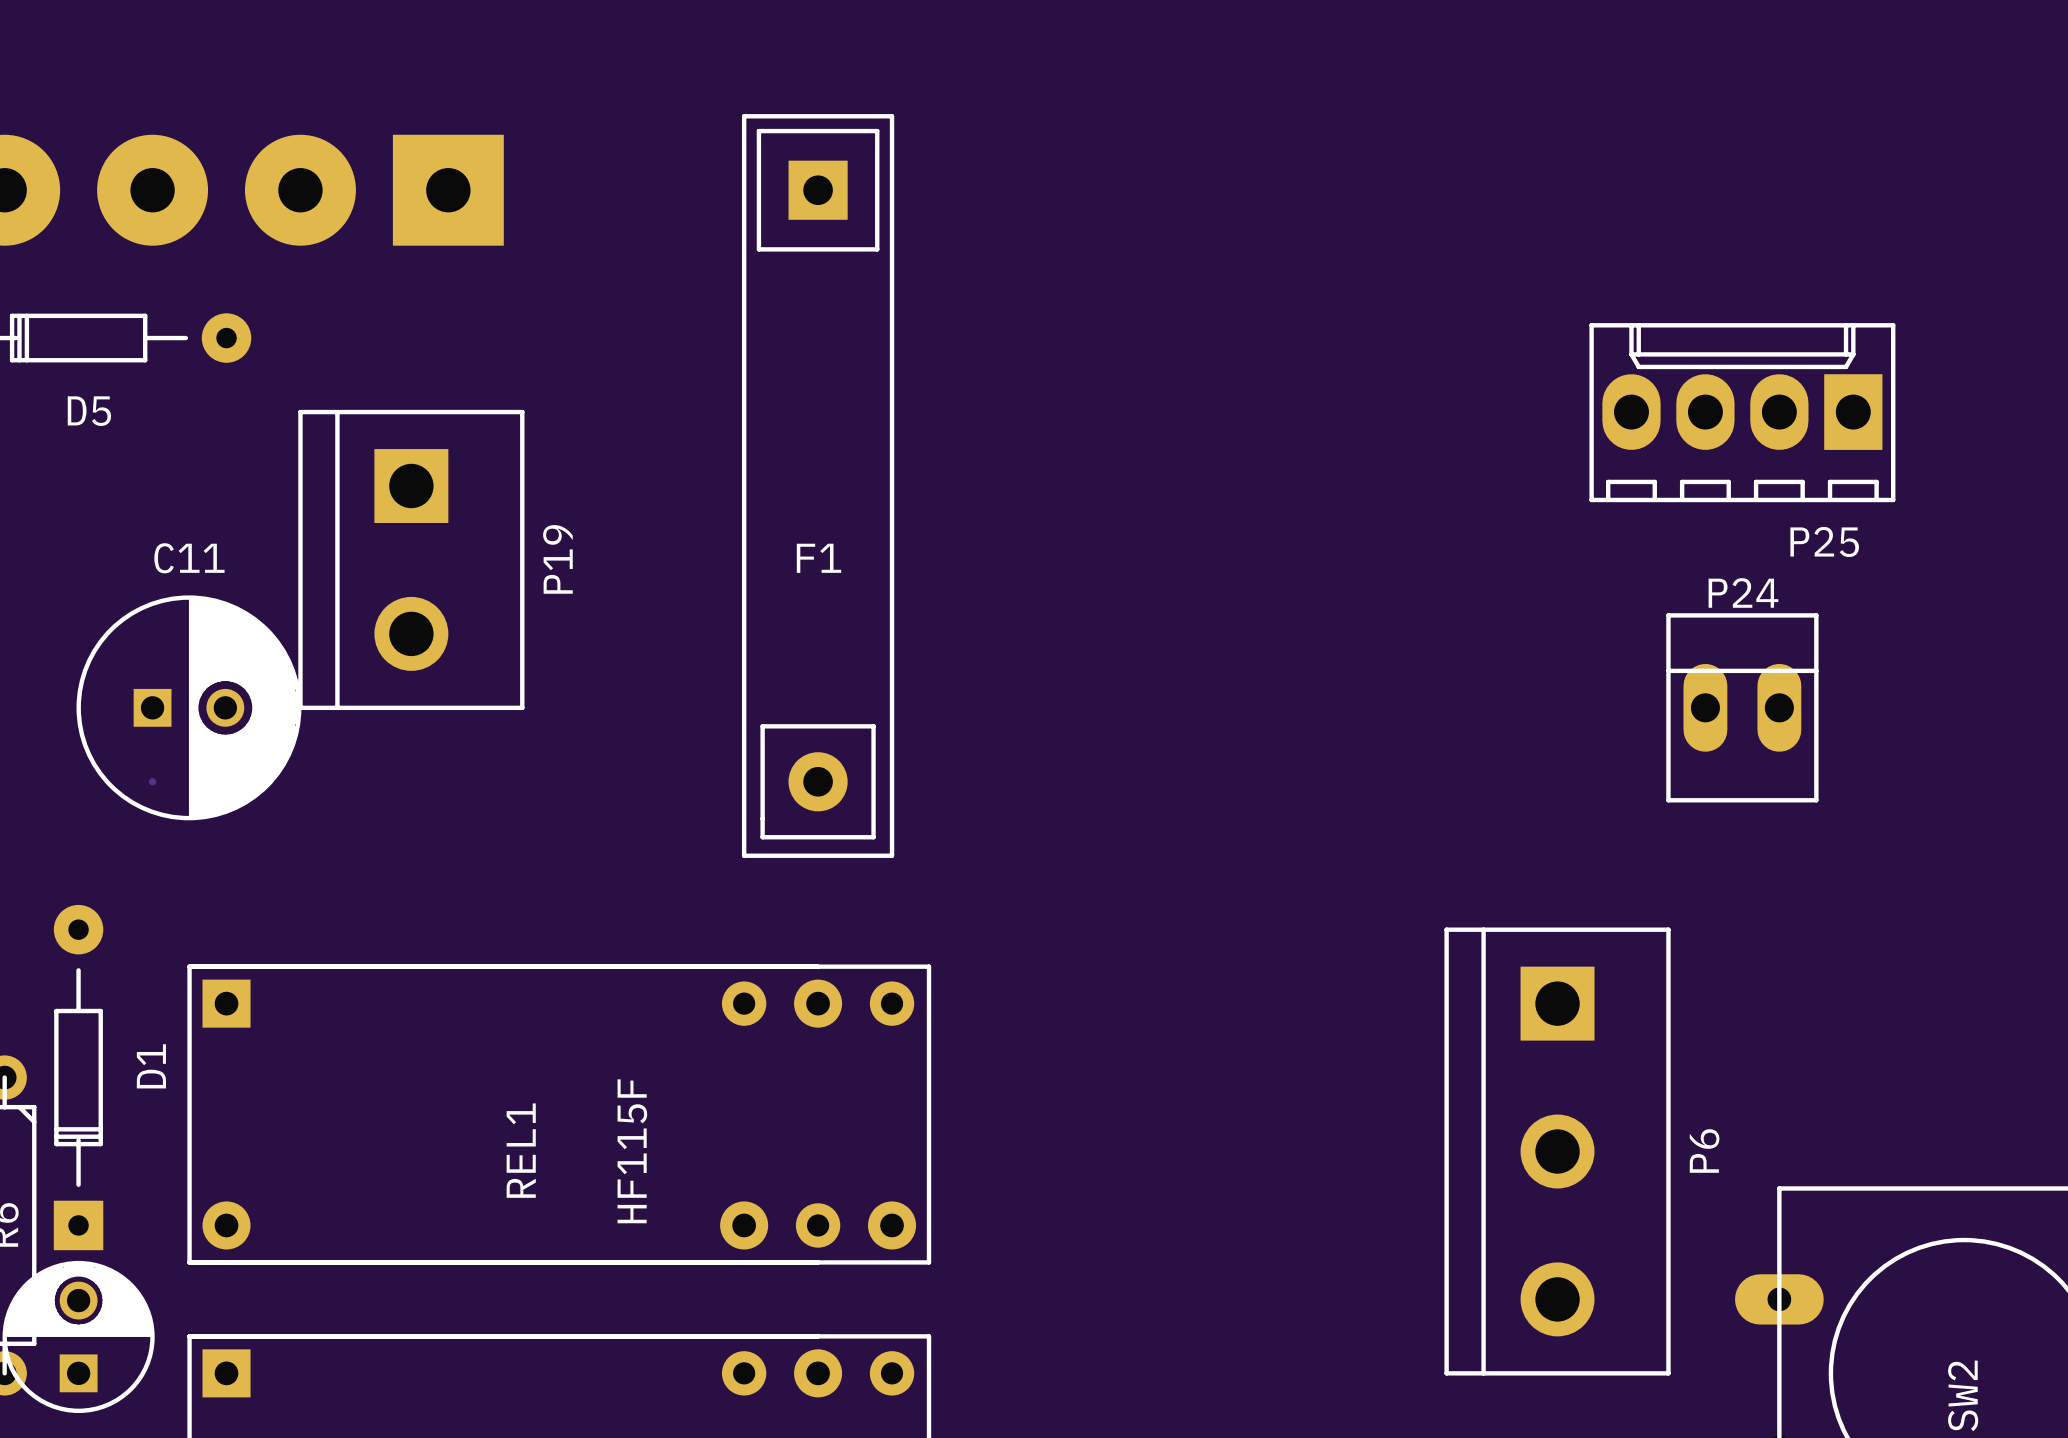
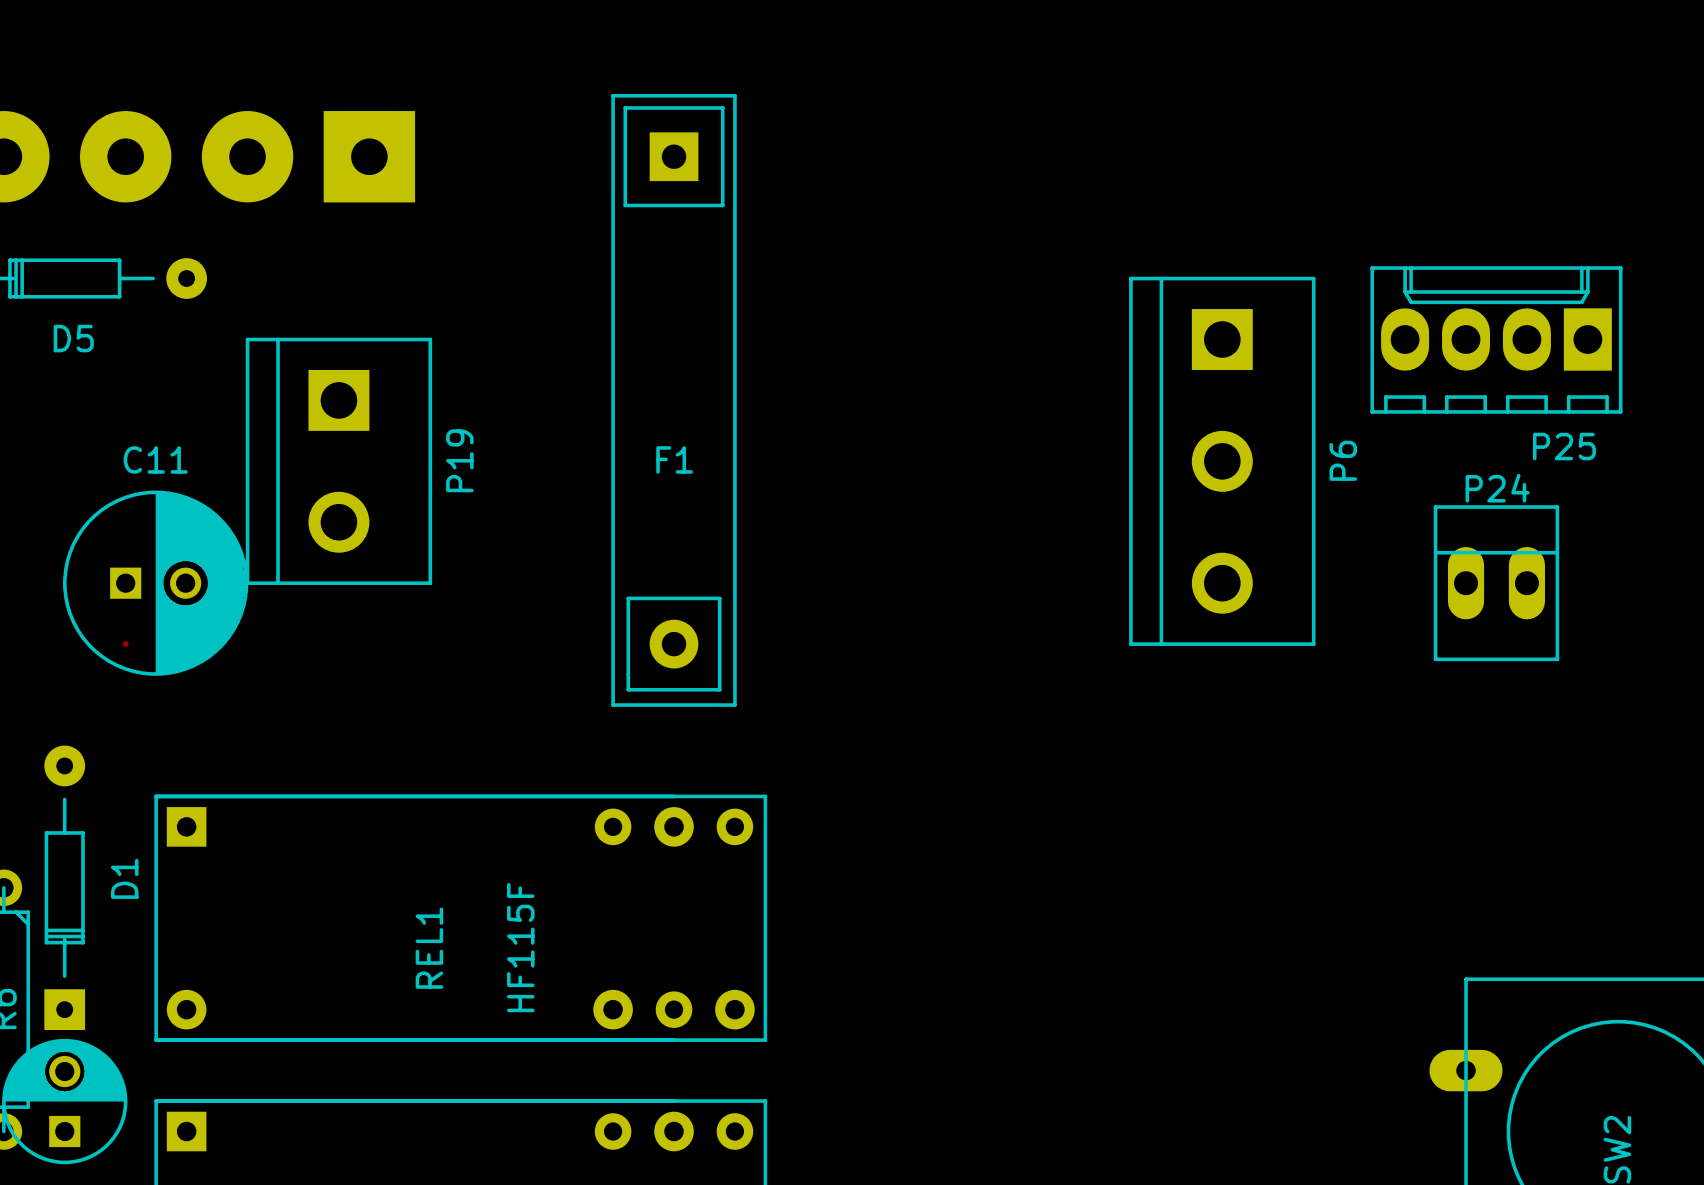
P25 position: (1742, 412) -> (1496, 339)
P24 position: (1742, 707) -> (1496, 583)
P6 position: (1557, 1151) -> (1222, 461)

